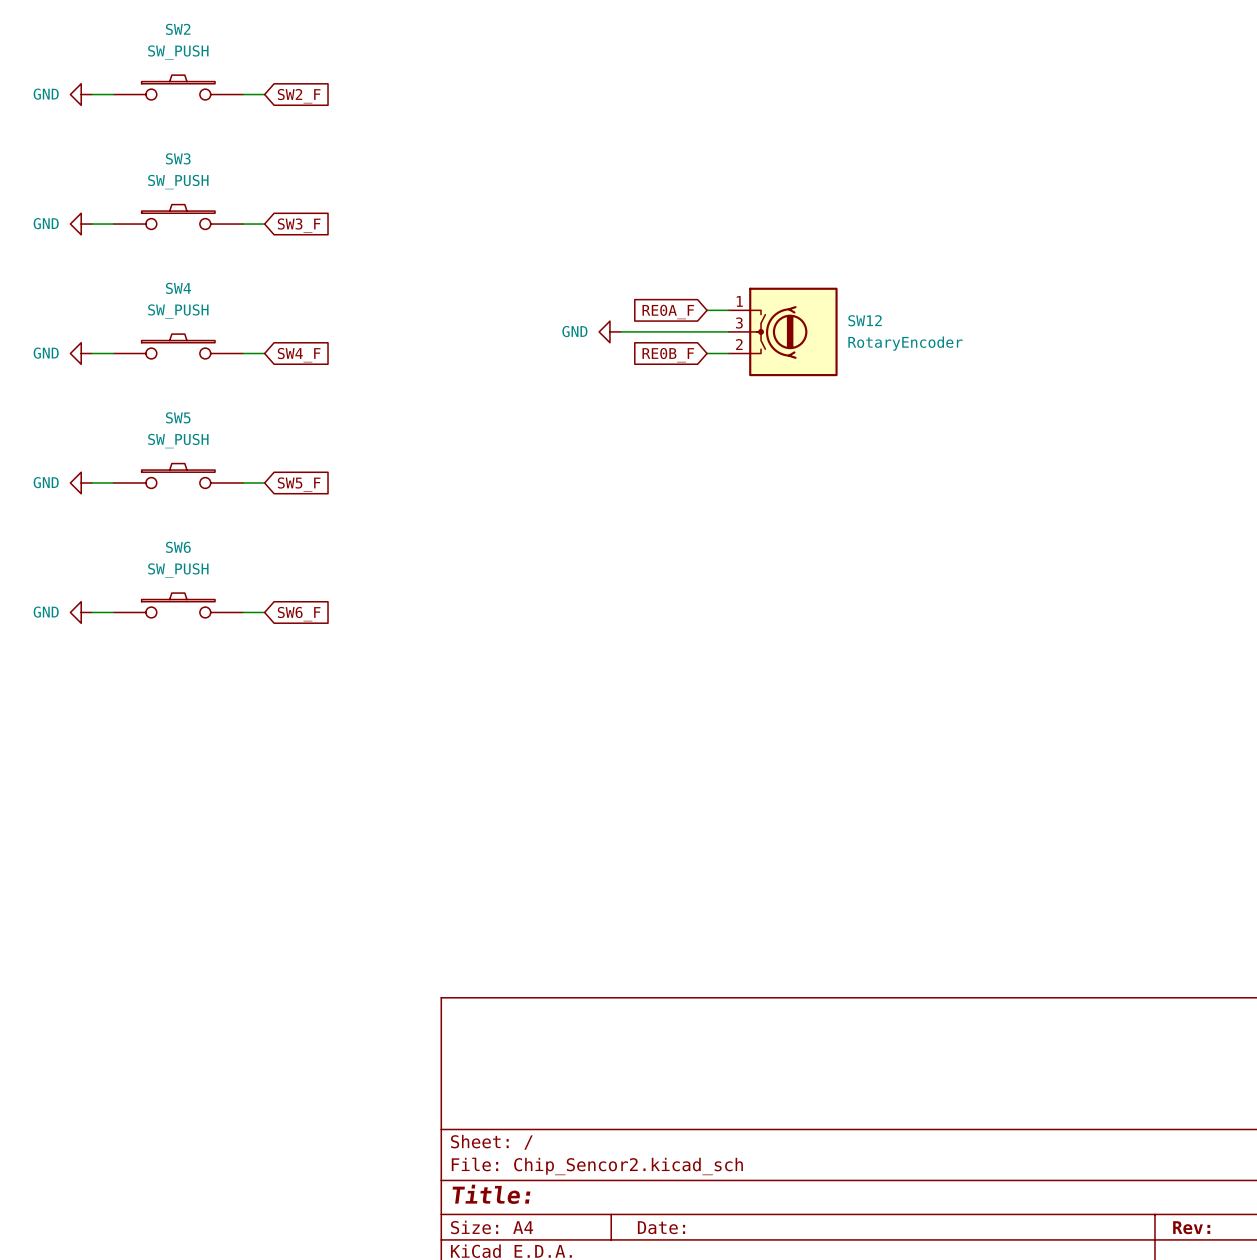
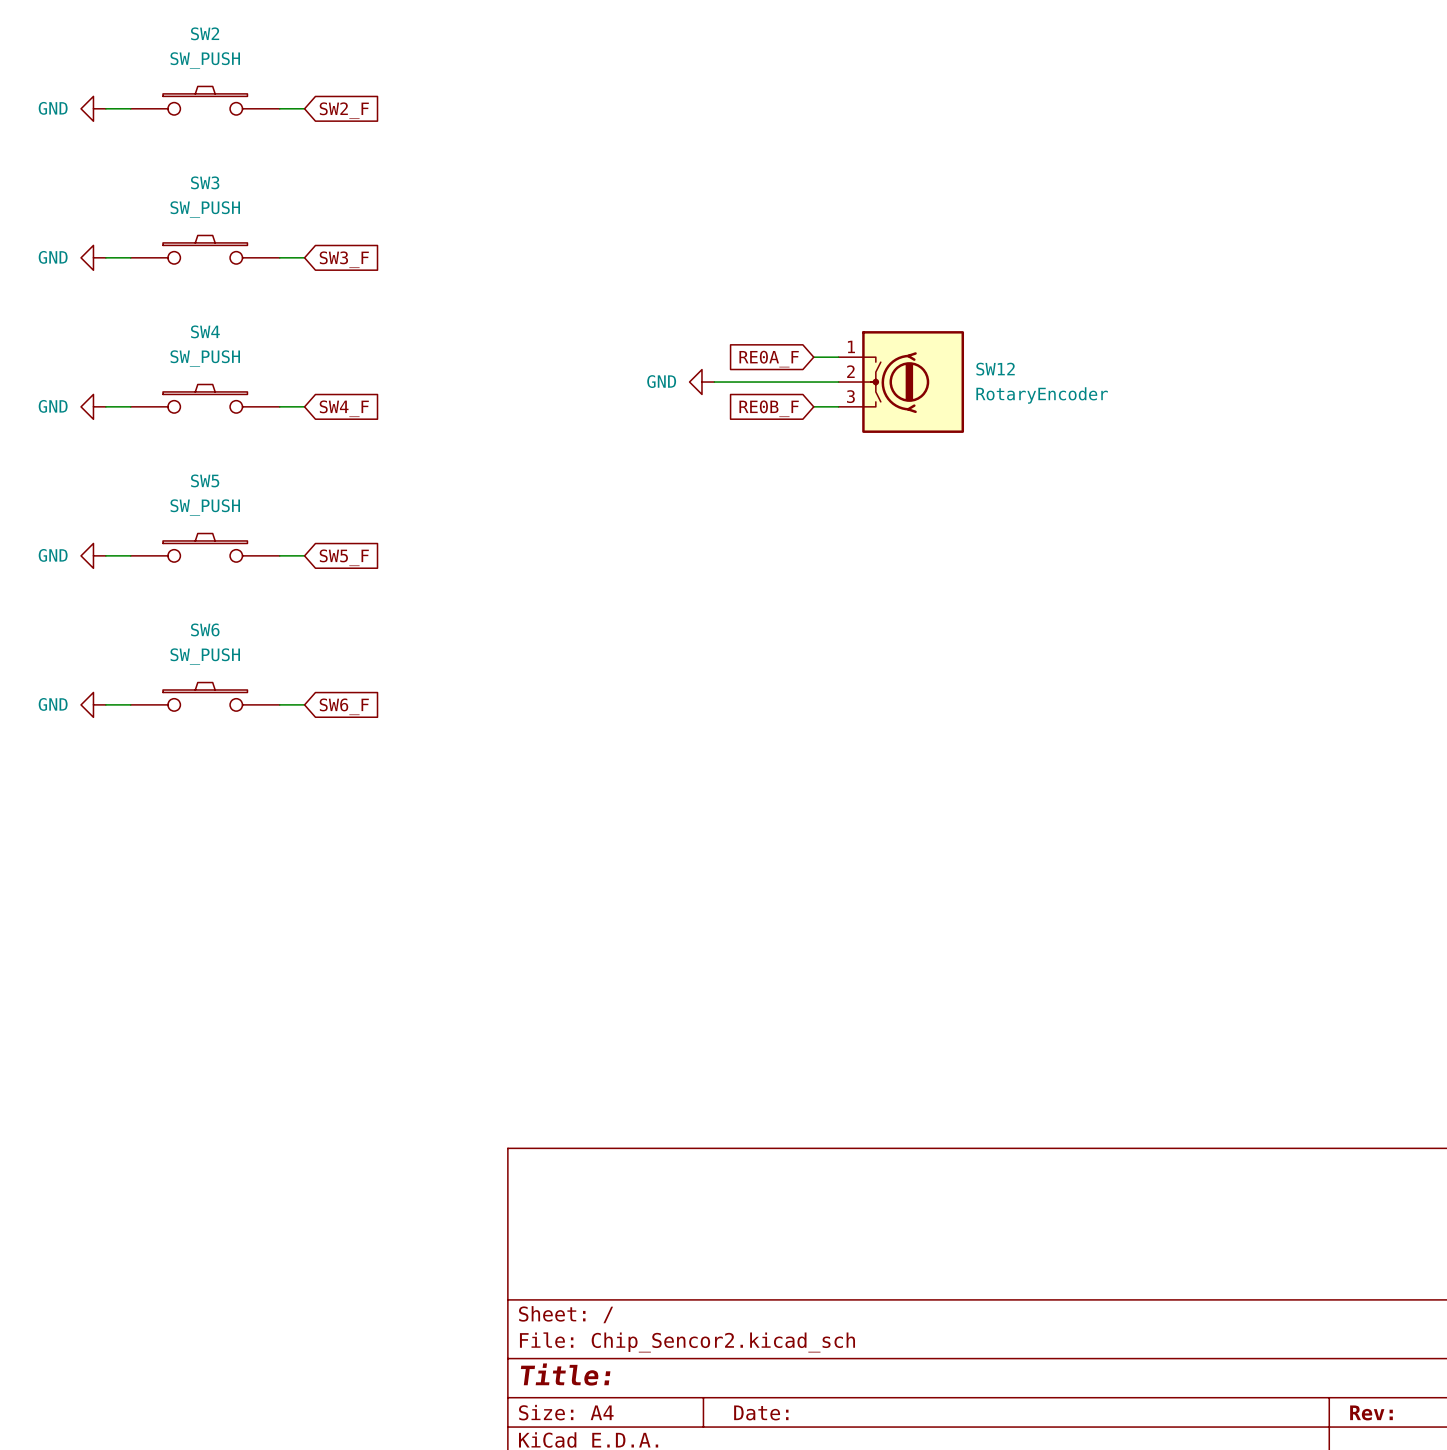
SW12 pin number: 3 (739, 323) -> 2 (850, 371)
SW12 pin number: 2 (739, 344) -> 3 (850, 396)

